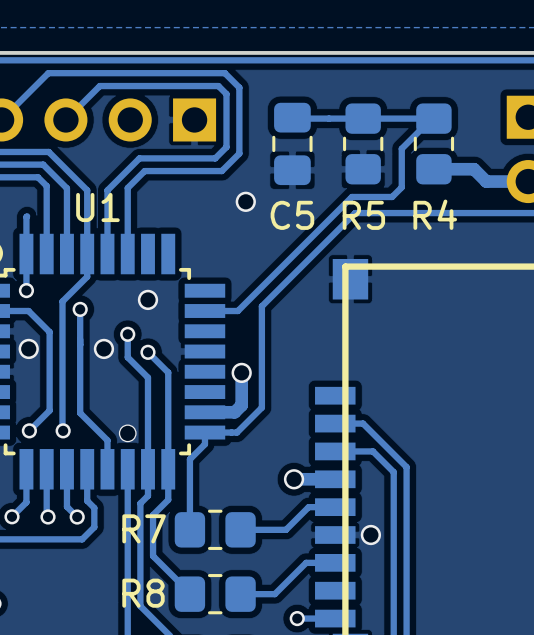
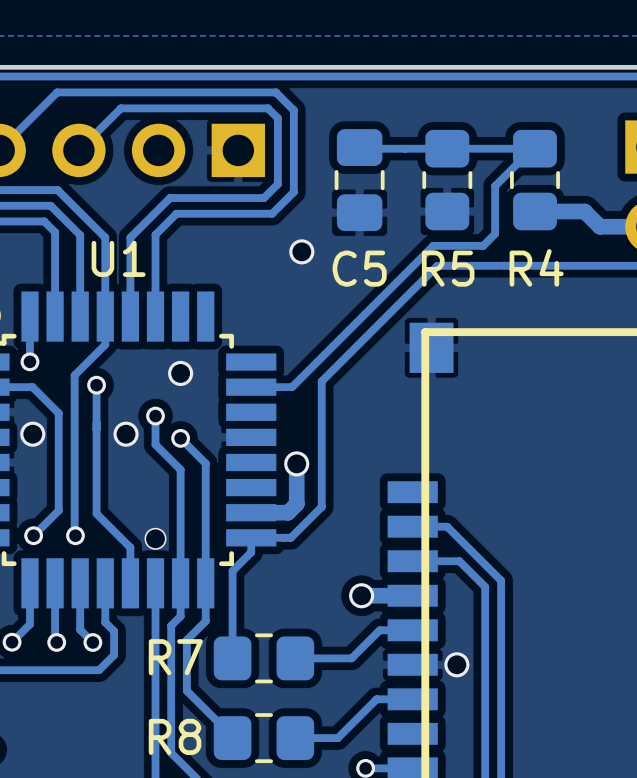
track: (27, 216) (26, 254) -> none

